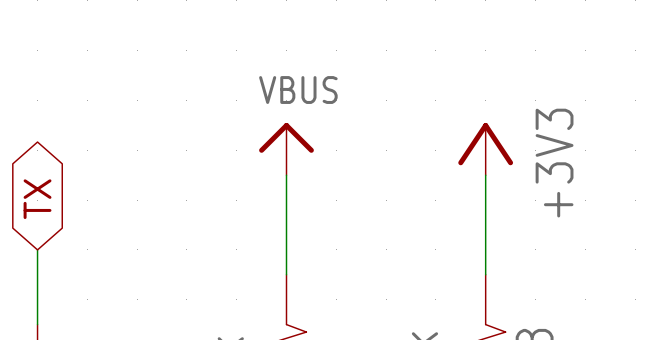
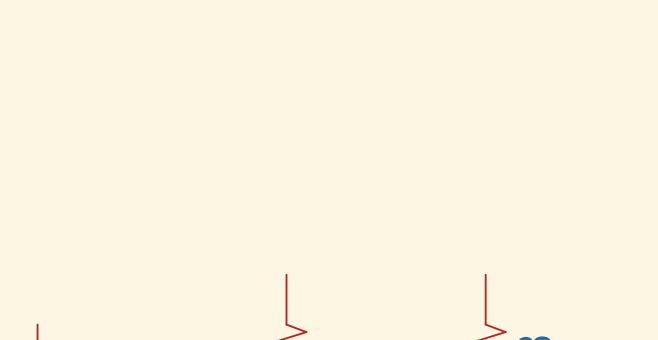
power symbol: VBUS (286, 149) -> none
power symbol: +3V3 (485, 149) -> none
wire: (286, 175) (286, 274) -> none
wire: (485, 175) (485, 274) -> none
global label: TX (37, 199) -> none
wire: (37, 249) (37, 324) -> none

